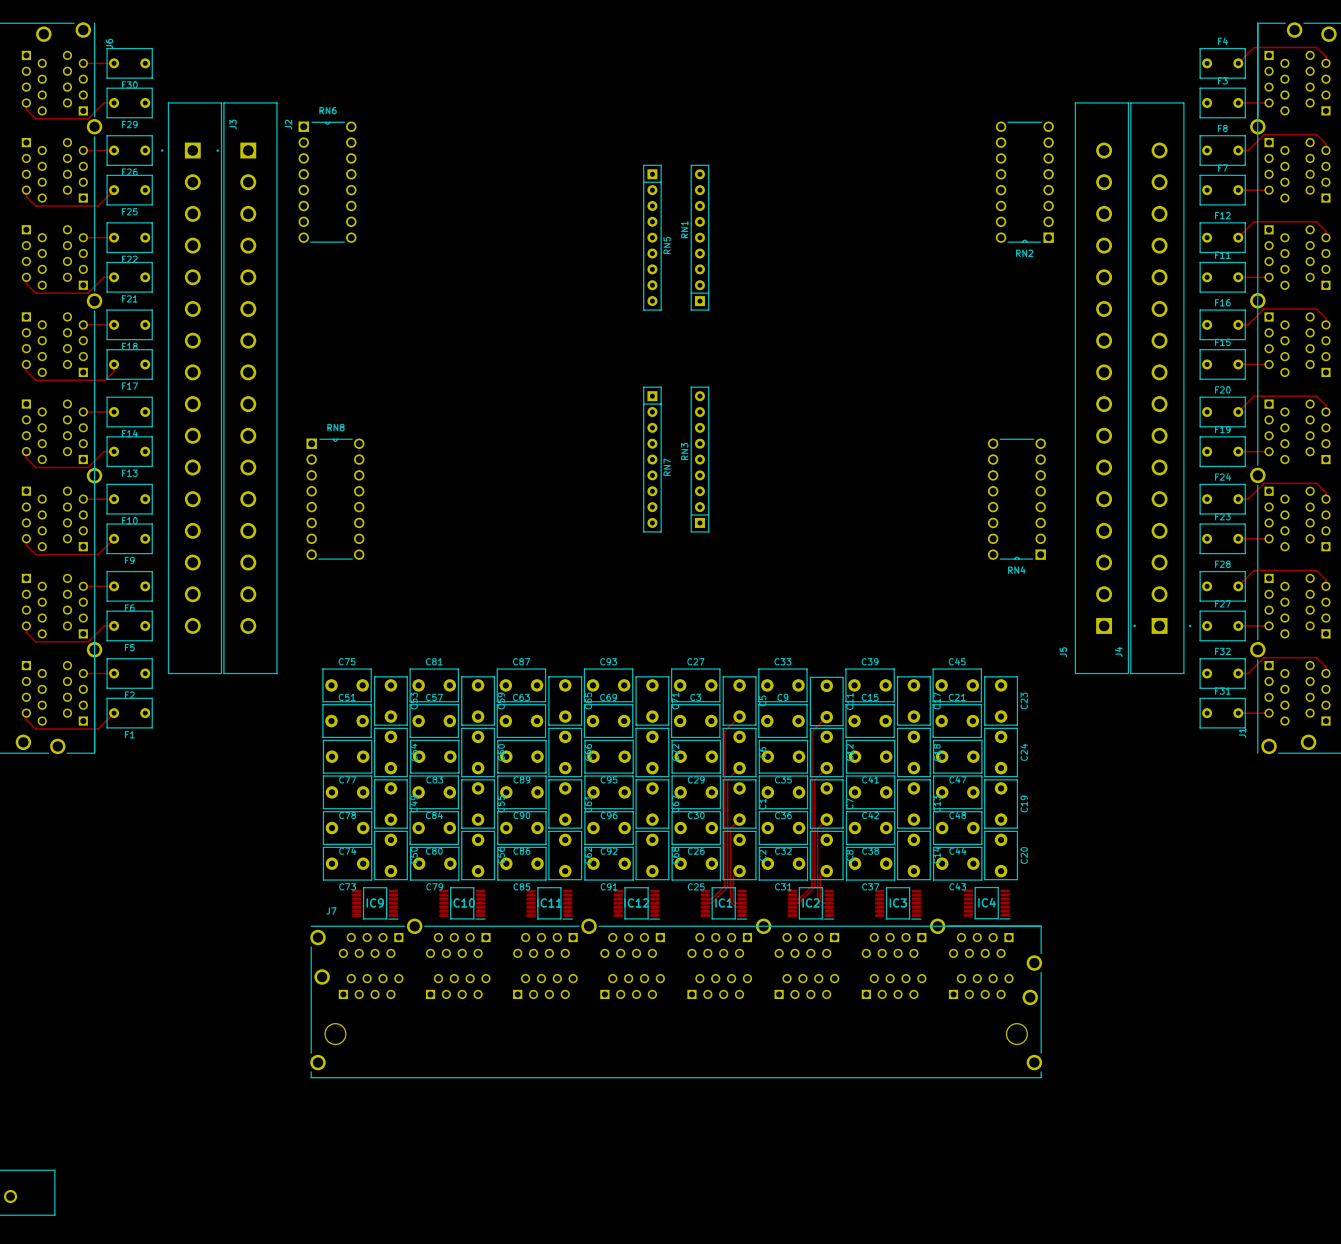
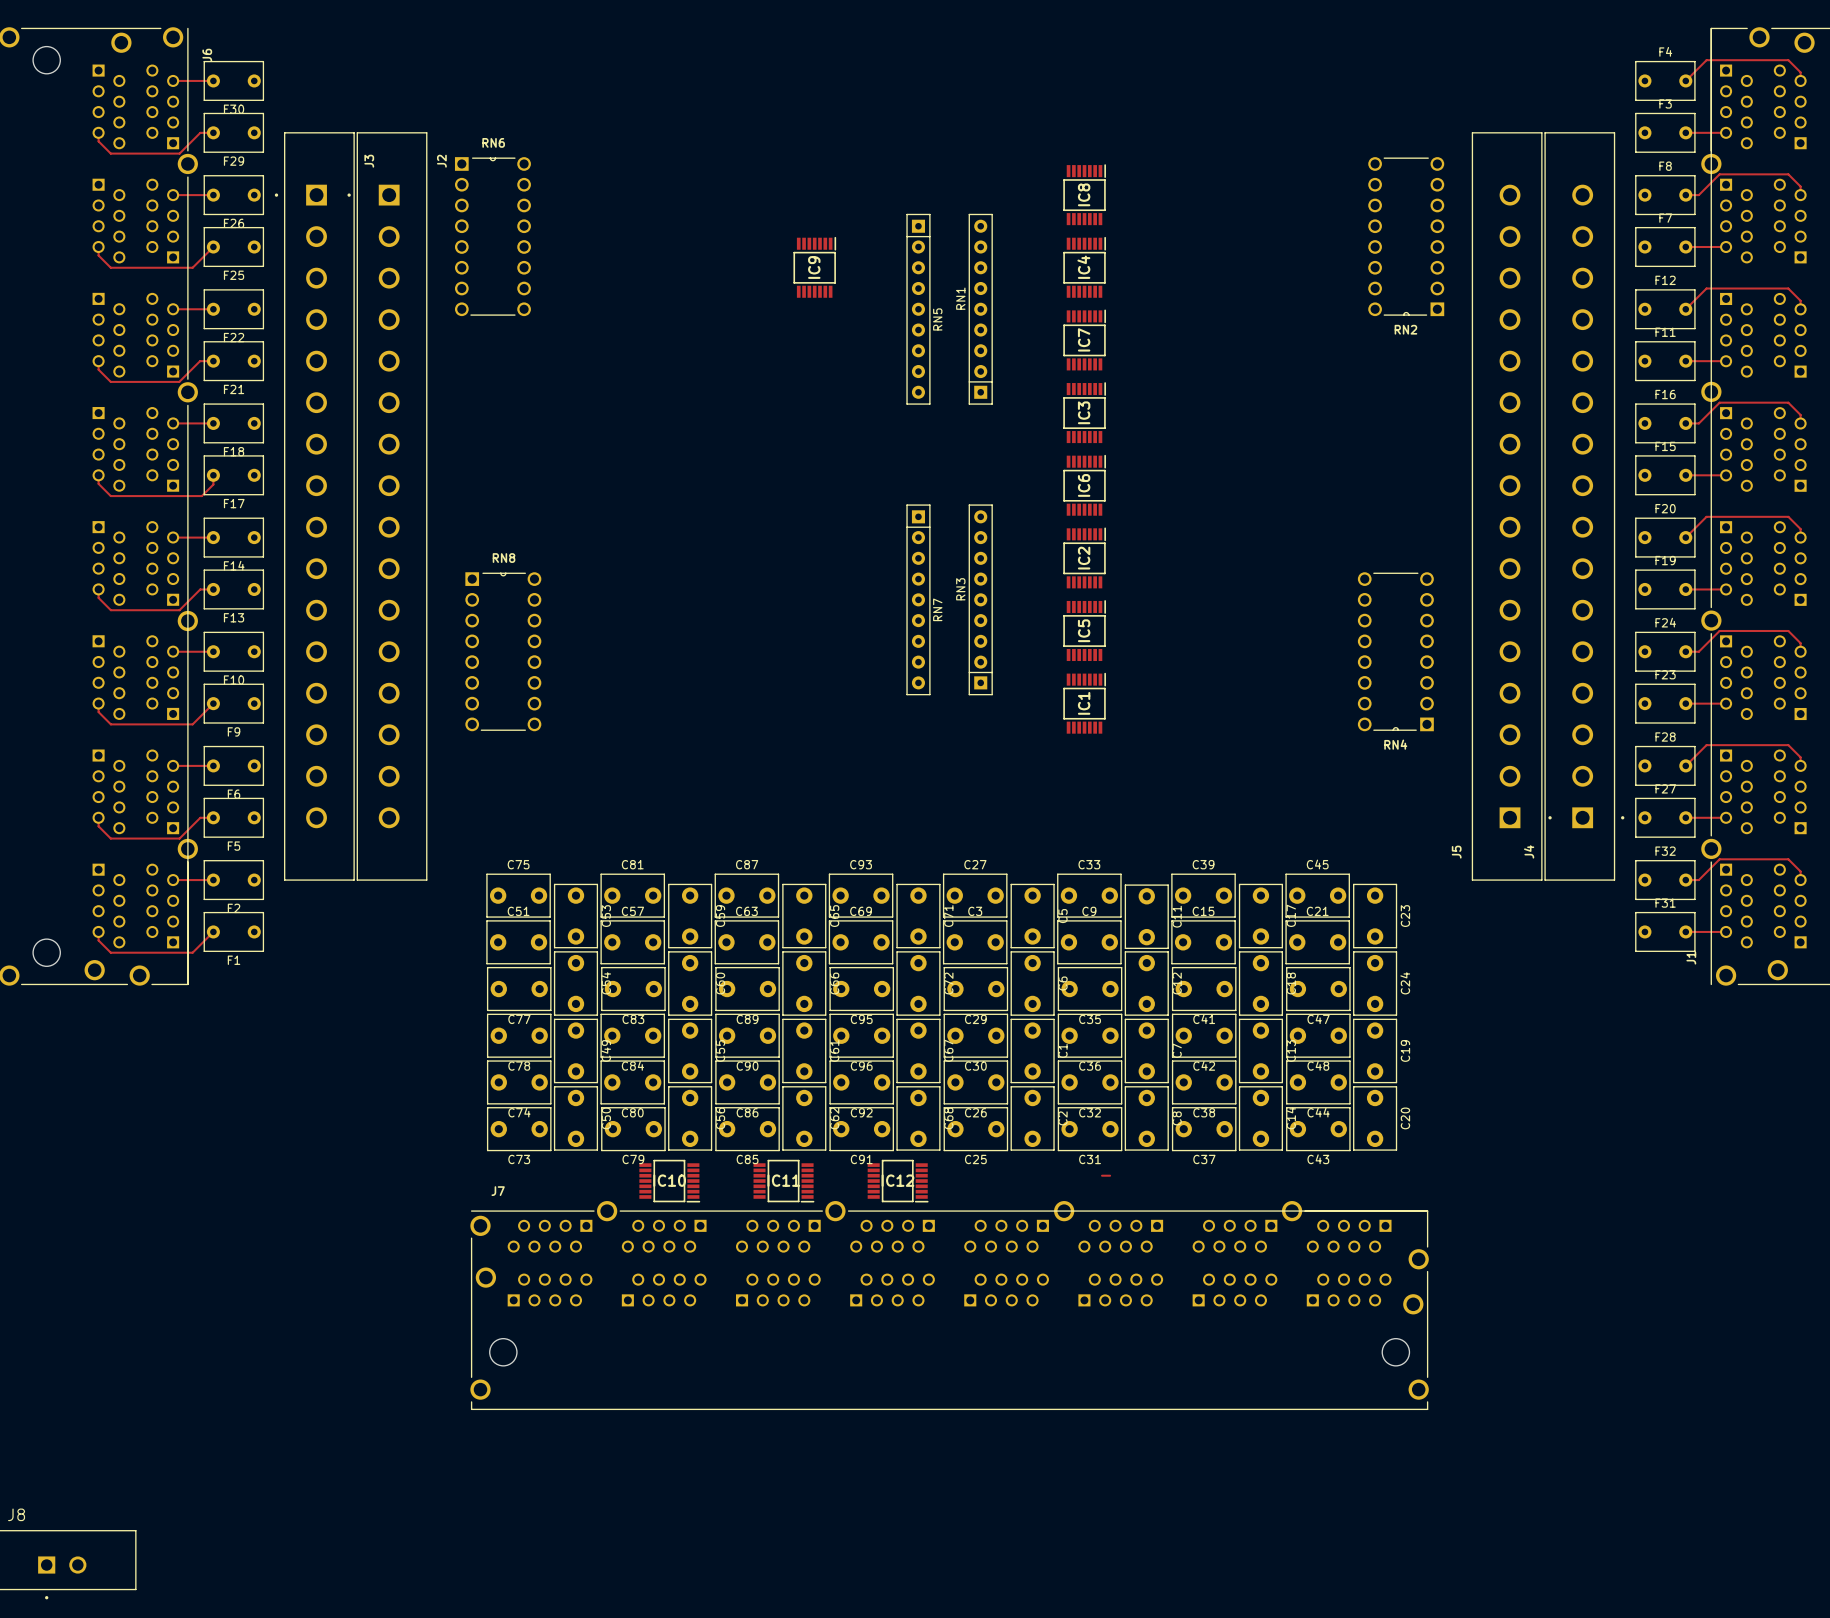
IC8: none -> (1084, 194)
IC7: none -> (1084, 339)
IC6: none -> (1084, 485)
IC5: none -> (1084, 630)
track: (739, 716) (724, 731) (724, 885) (711, 899) (705, 899) -> none
track: (826, 717) (812, 731) (812, 886) (798, 899) -> none
track: (739, 768) (727, 779) (727, 887) (711, 903) (705, 903) -> none
track: (826, 768) (814, 779) (814, 887) (798, 903) (792, 903) -> none
track: (739, 819) (730, 828) (730, 902) (735, 907) (742, 907) -> none
track: (826, 819) (817, 828) (817, 901) (823, 907) (829, 907) -> none
track: (739, 871) (733, 877) (733, 901) (735, 903) (742, 903) -> none
track: (826, 871) (820, 877) (820, 900) (823, 903) (829, 903) -> none
IC9 rotation: 0° (375, 903) -> 90° counterclockwise (814, 267)
IC9 position: (375, 903) -> (814, 267)
IC1 rotation: 0° (724, 903) -> 90° counterclockwise (1084, 703)
IC1 position: (724, 903) -> (1084, 703)
IC2 rotation: 0° (811, 903) -> 90° counterclockwise (1084, 557)
IC2 position: (811, 903) -> (1084, 557)
IC3 rotation: 0° (898, 903) -> 90° counterclockwise (1084, 412)
IC3 position: (898, 903) -> (1084, 412)
IC4 rotation: 0° (987, 903) -> 90° counterclockwise (1084, 267)
IC4 position: (987, 903) -> (1084, 267)

